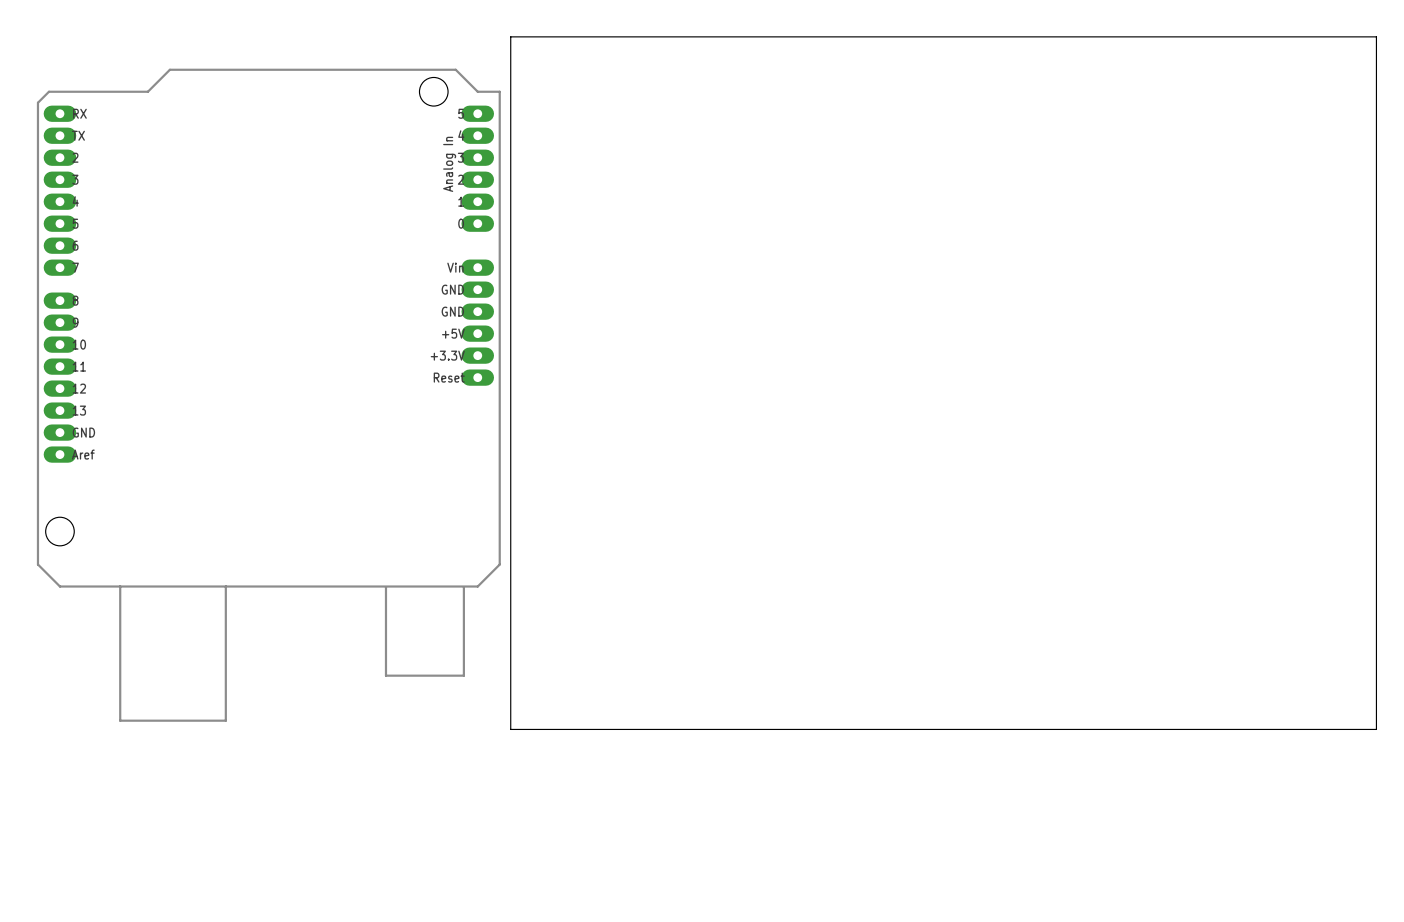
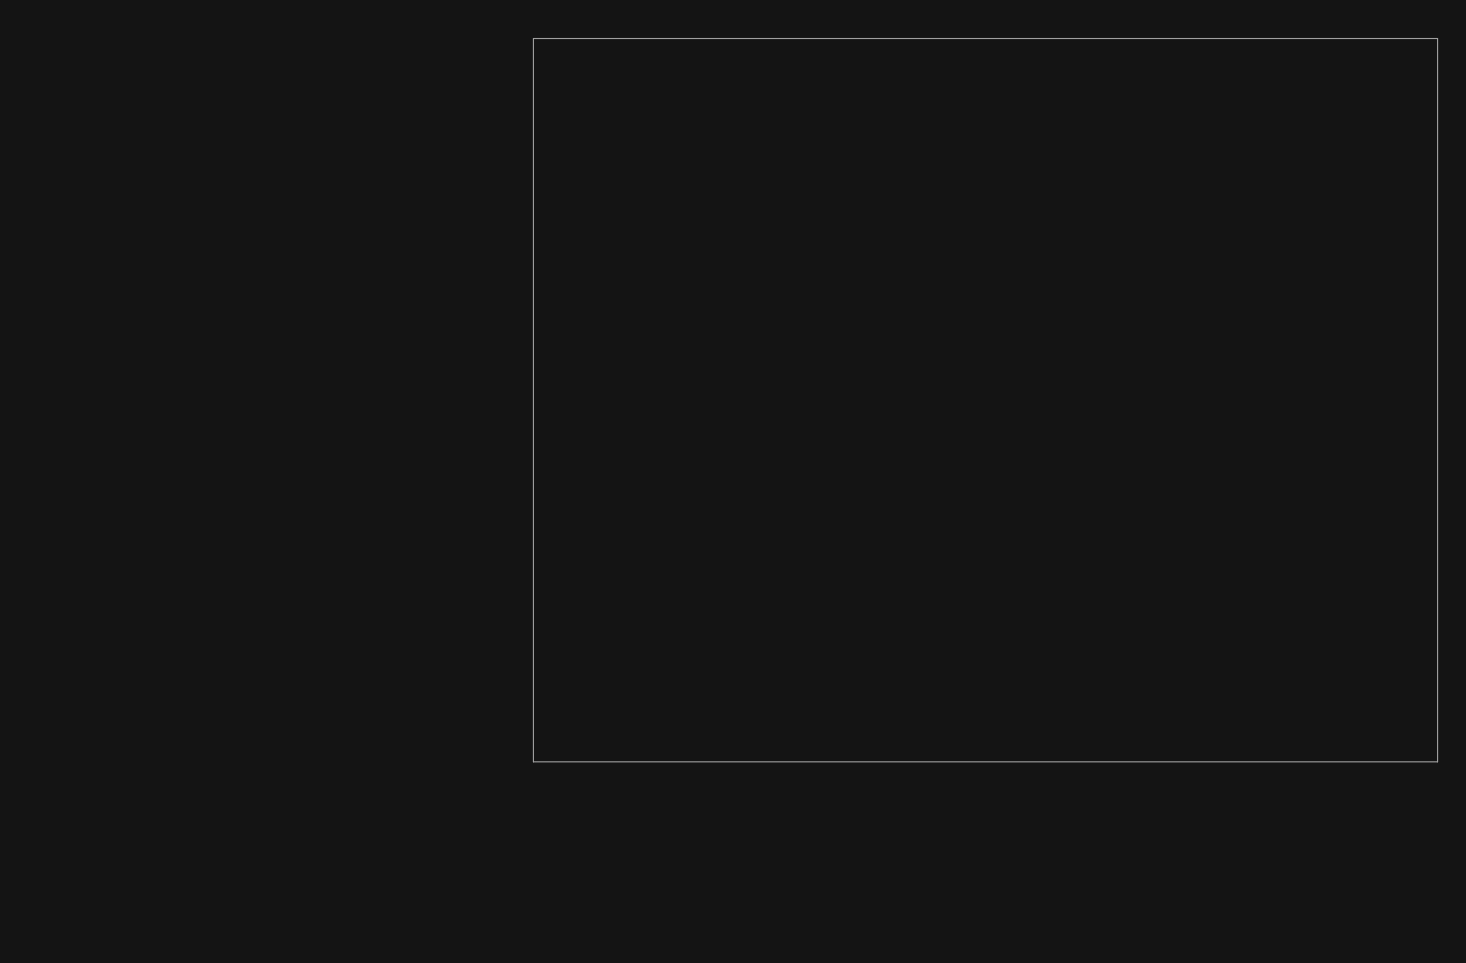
part: (268, 395) -> none

